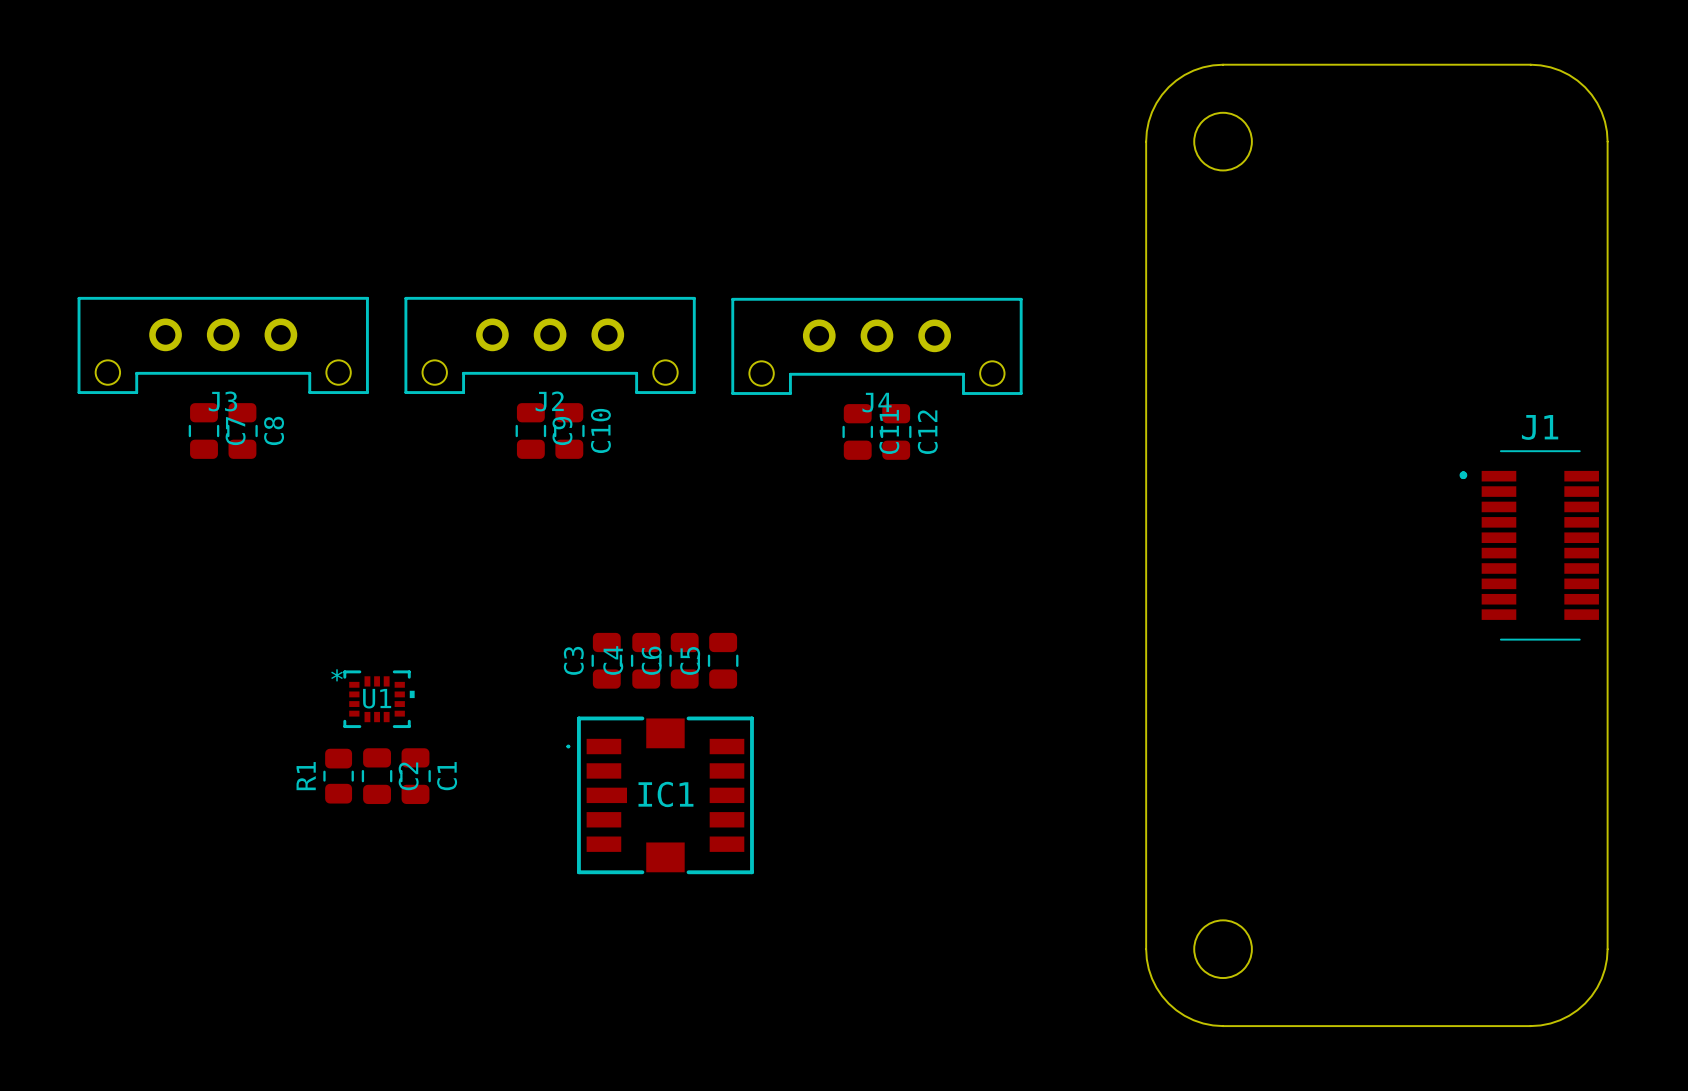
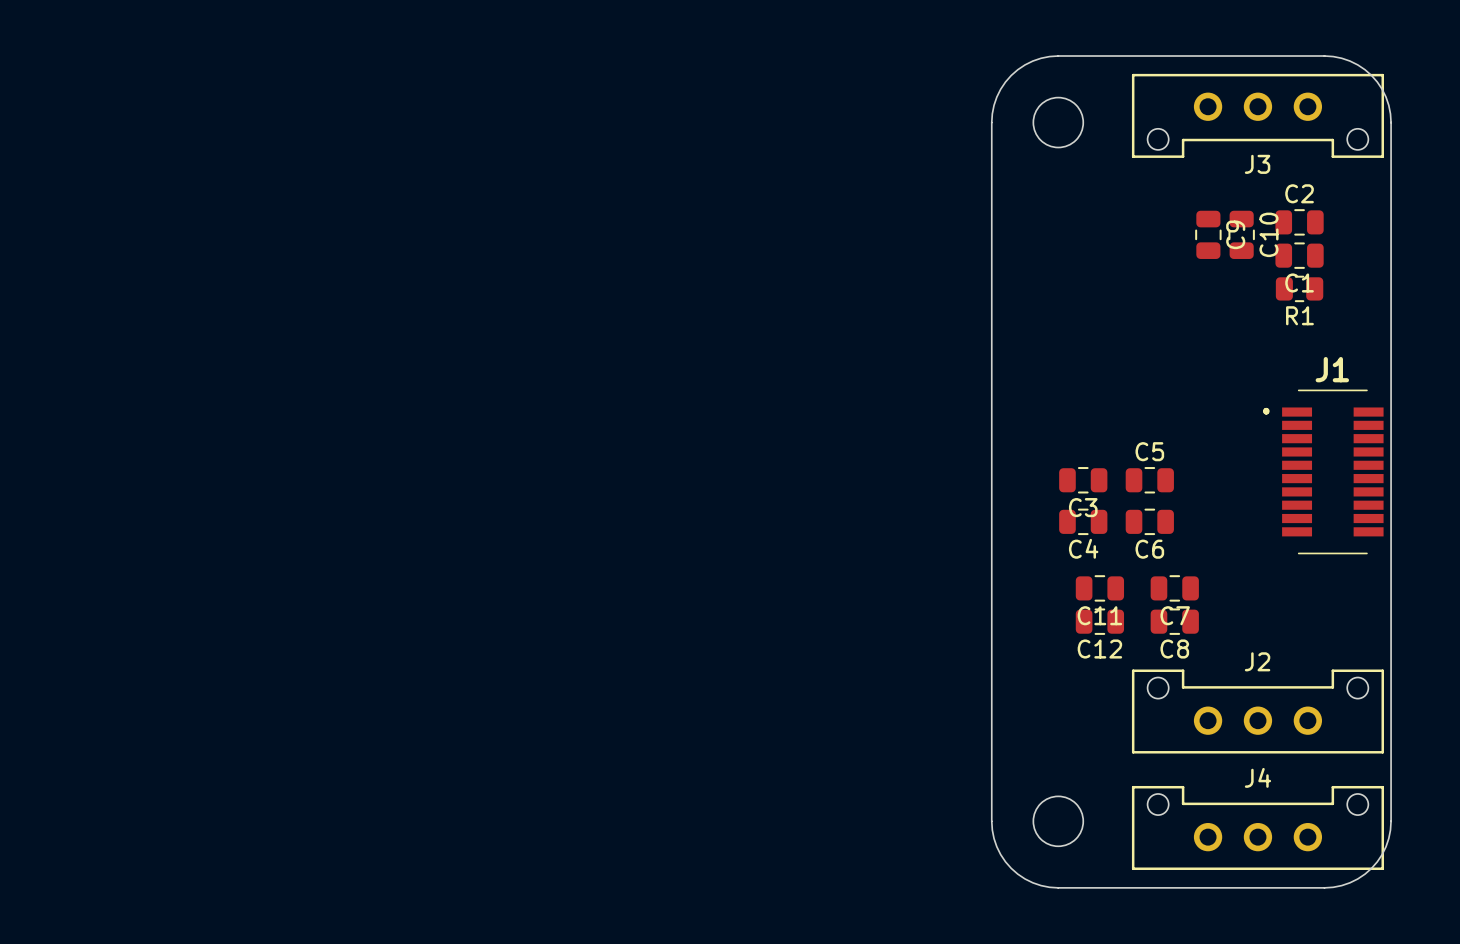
J3 position: (223, 345) -> (1257, 115)
J2 rotation: 0° (550, 345) -> 180° (1257, 711)
J2 position: (550, 345) -> (1257, 711)
J4 rotation: 0° (876, 346) -> 180° (1257, 827)
J4 position: (876, 346) -> (1257, 827)
C7 rotation: 0° (204, 431) -> 90° clockwise (1174, 588)
C7 position: (204, 431) -> (1174, 588)
C8 rotation: 0° (242, 431) -> 90° clockwise (1174, 621)
C8 position: (242, 431) -> (1174, 621)
C9 position: (530, 431) -> (1208, 234)
C10 position: (569, 431) -> (1241, 234)
C11 rotation: 0° (857, 431) -> 90° clockwise (1099, 588)
C11 position: (857, 431) -> (1099, 588)
C12 rotation: 0° (896, 431) -> 90° clockwise (1099, 621)
C12 position: (896, 431) -> (1099, 621)
C3 name position: C3 (573, 660) -> C3 (1083, 507)
C3 rotation: 0° (606, 660) -> 90° clockwise (1083, 480)
C3 position: (606, 660) -> (1083, 480)
C4 name position: C4 (613, 660) -> C4 (1083, 548)
C4 rotation: 0° (646, 660) -> 90° clockwise (1083, 521)
C4 position: (646, 660) -> (1083, 521)
C6 name position: C6 (651, 660) -> C6 (1149, 549)
C6 rotation: 0° (684, 660) -> 90° clockwise (1149, 521)
C6 position: (684, 660) -> (1149, 521)
C5 rotation: 0° (723, 660) -> 90° clockwise (1149, 480)
C5 position: (723, 660) -> (1149, 480)
U1: (379, 699) -> none
R1 name position: R1 (306, 776) -> R1 (1299, 315)
R1 rotation: 0° (338, 776) -> 90° clockwise (1299, 288)
R1 position: (338, 776) -> (1299, 288)
C2 rotation: 0° (377, 776) -> 90° clockwise (1299, 222)
C2 position: (377, 776) -> (1299, 222)
C2 name position: C2 (408, 776) -> C2 (1299, 193)
C1 rotation: 0° (415, 776) -> 90° clockwise (1299, 255)
C1 position: (415, 776) -> (1299, 255)
IC1: (660, 795) -> none

